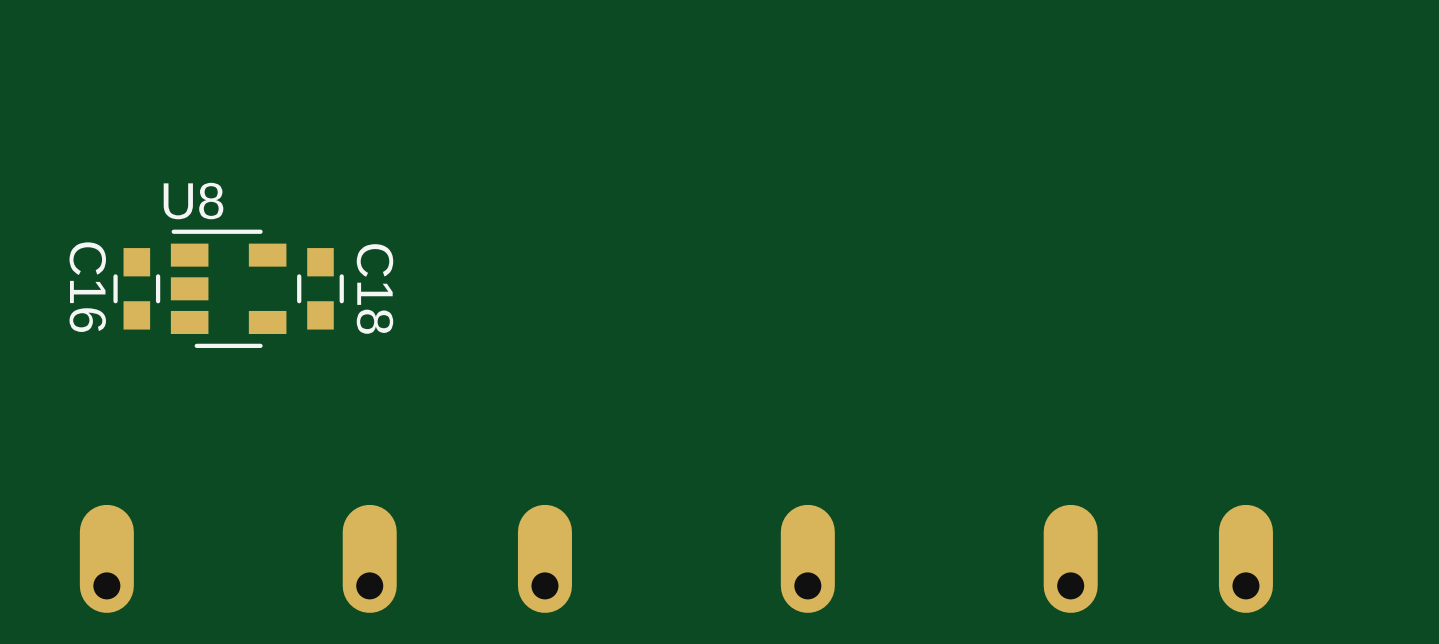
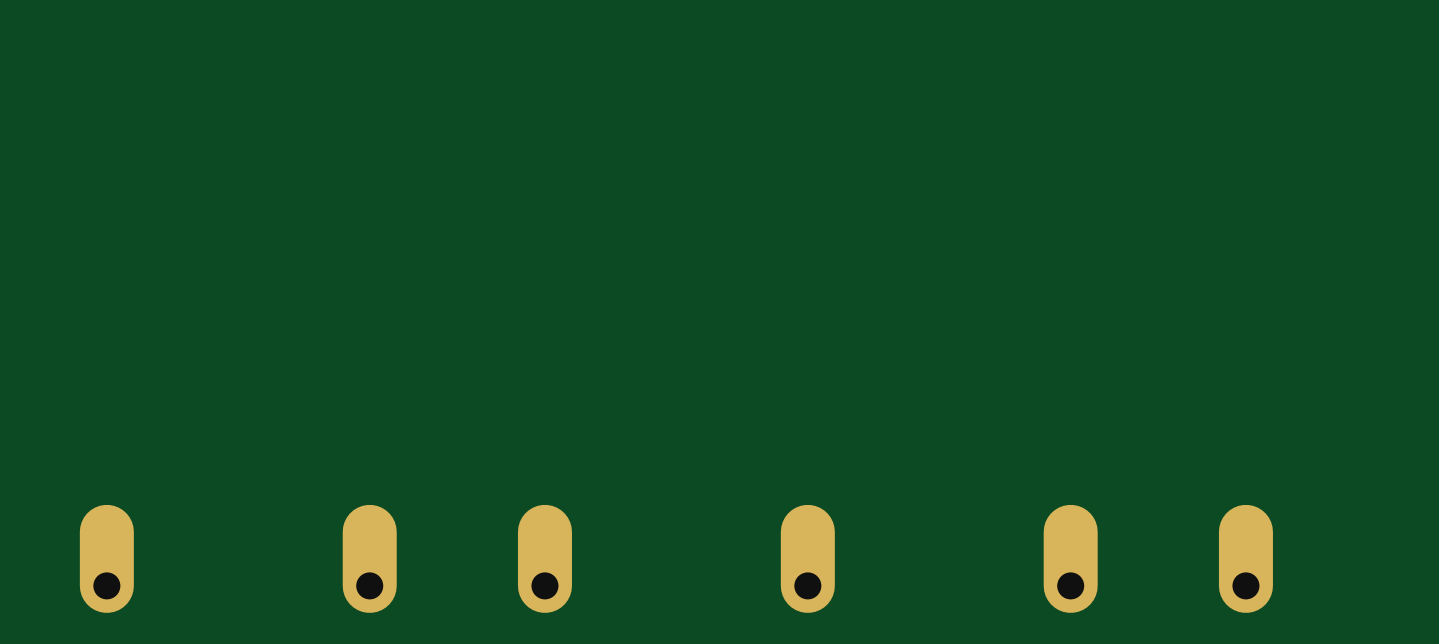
C16: (136, 288) -> none
U8: (228, 288) -> none
C18: (320, 288) -> none

